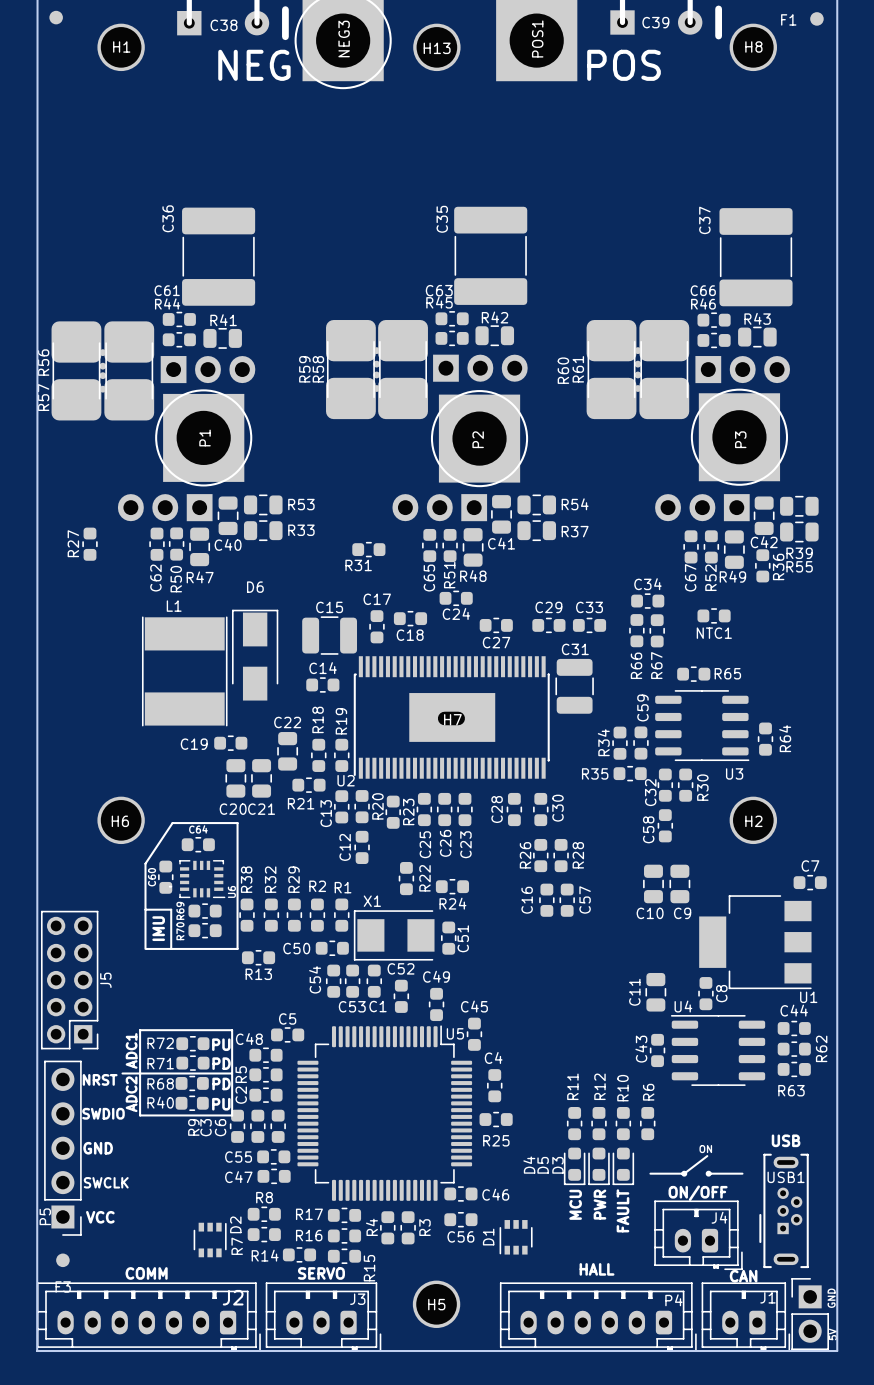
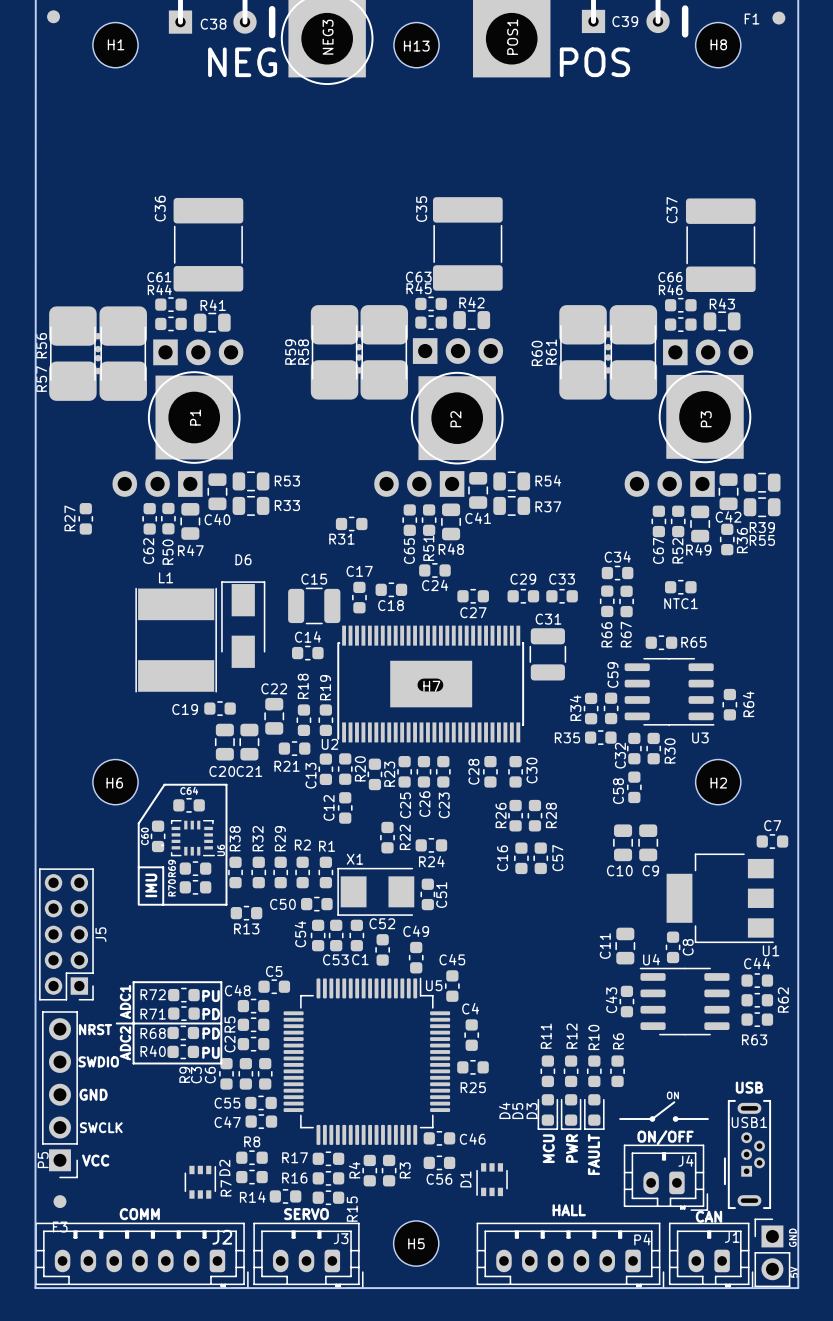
H1 footprint: [97, 23, 145, 72] -> [92, 22, 139, 68]
H13 footprint: [413, 23, 461, 72] -> [393, 22, 440, 68]
H8 footprint: [729, 23, 778, 72] -> [695, 22, 741, 68]
H6 footprint: [97, 796, 145, 845] -> [92, 759, 139, 805]
H2 footprint: [729, 796, 778, 845] -> [695, 759, 741, 805]
H5 footprint: [412, 1280, 461, 1329] -> [393, 1220, 439, 1267]

